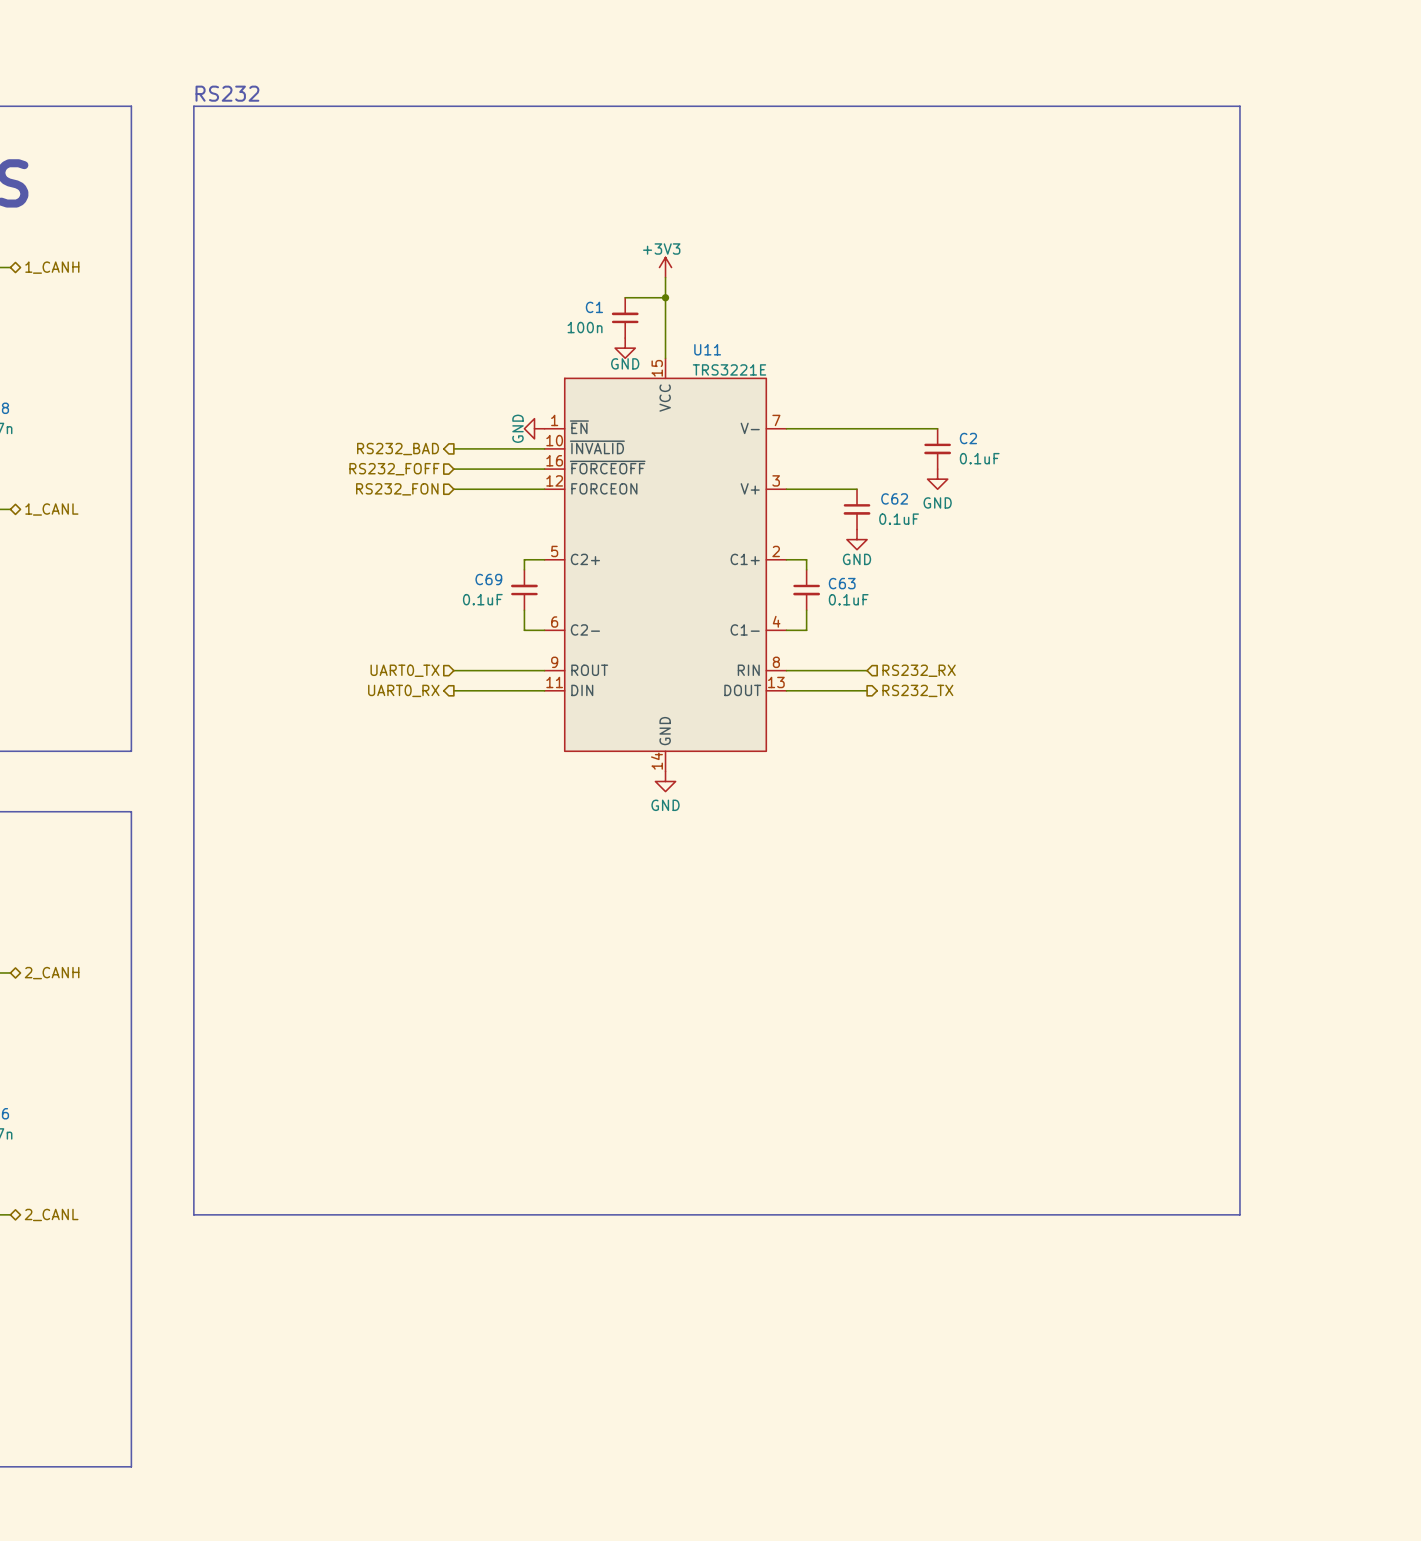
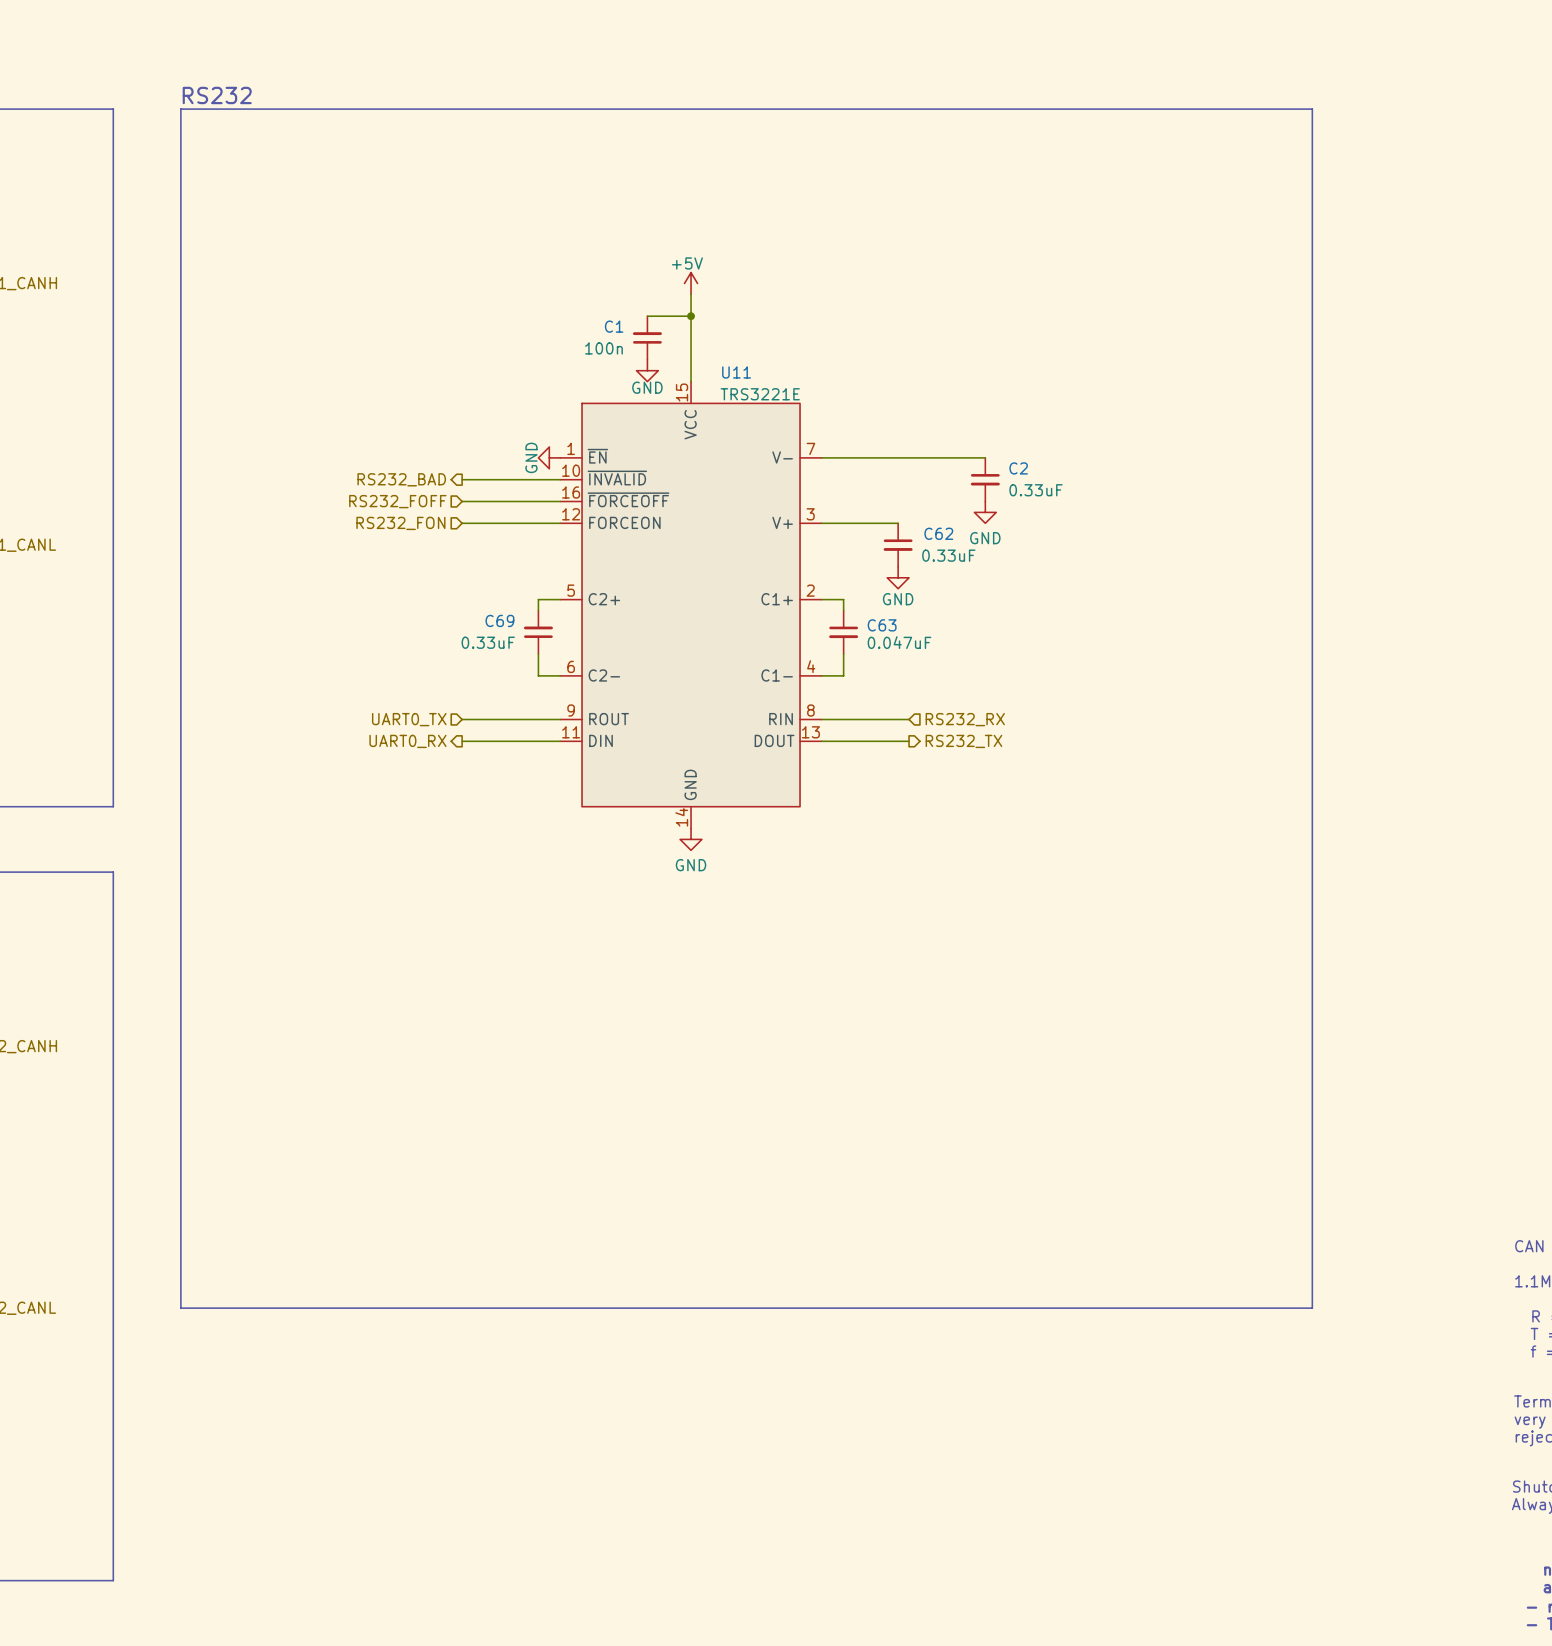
power symbol: +3V3 (665, 267) -> +5V (691, 283)
C2 value: 0.1uF (979, 458) -> 0.33uF (1036, 490)
C62 value: 0.1uF (899, 519) -> 0.33uF (948, 555)
C69 value: 0.1uF (482, 599) -> 0.33uF (488, 642)
C63 value: 0.1uF (848, 599) -> 0.047uF (899, 642)

